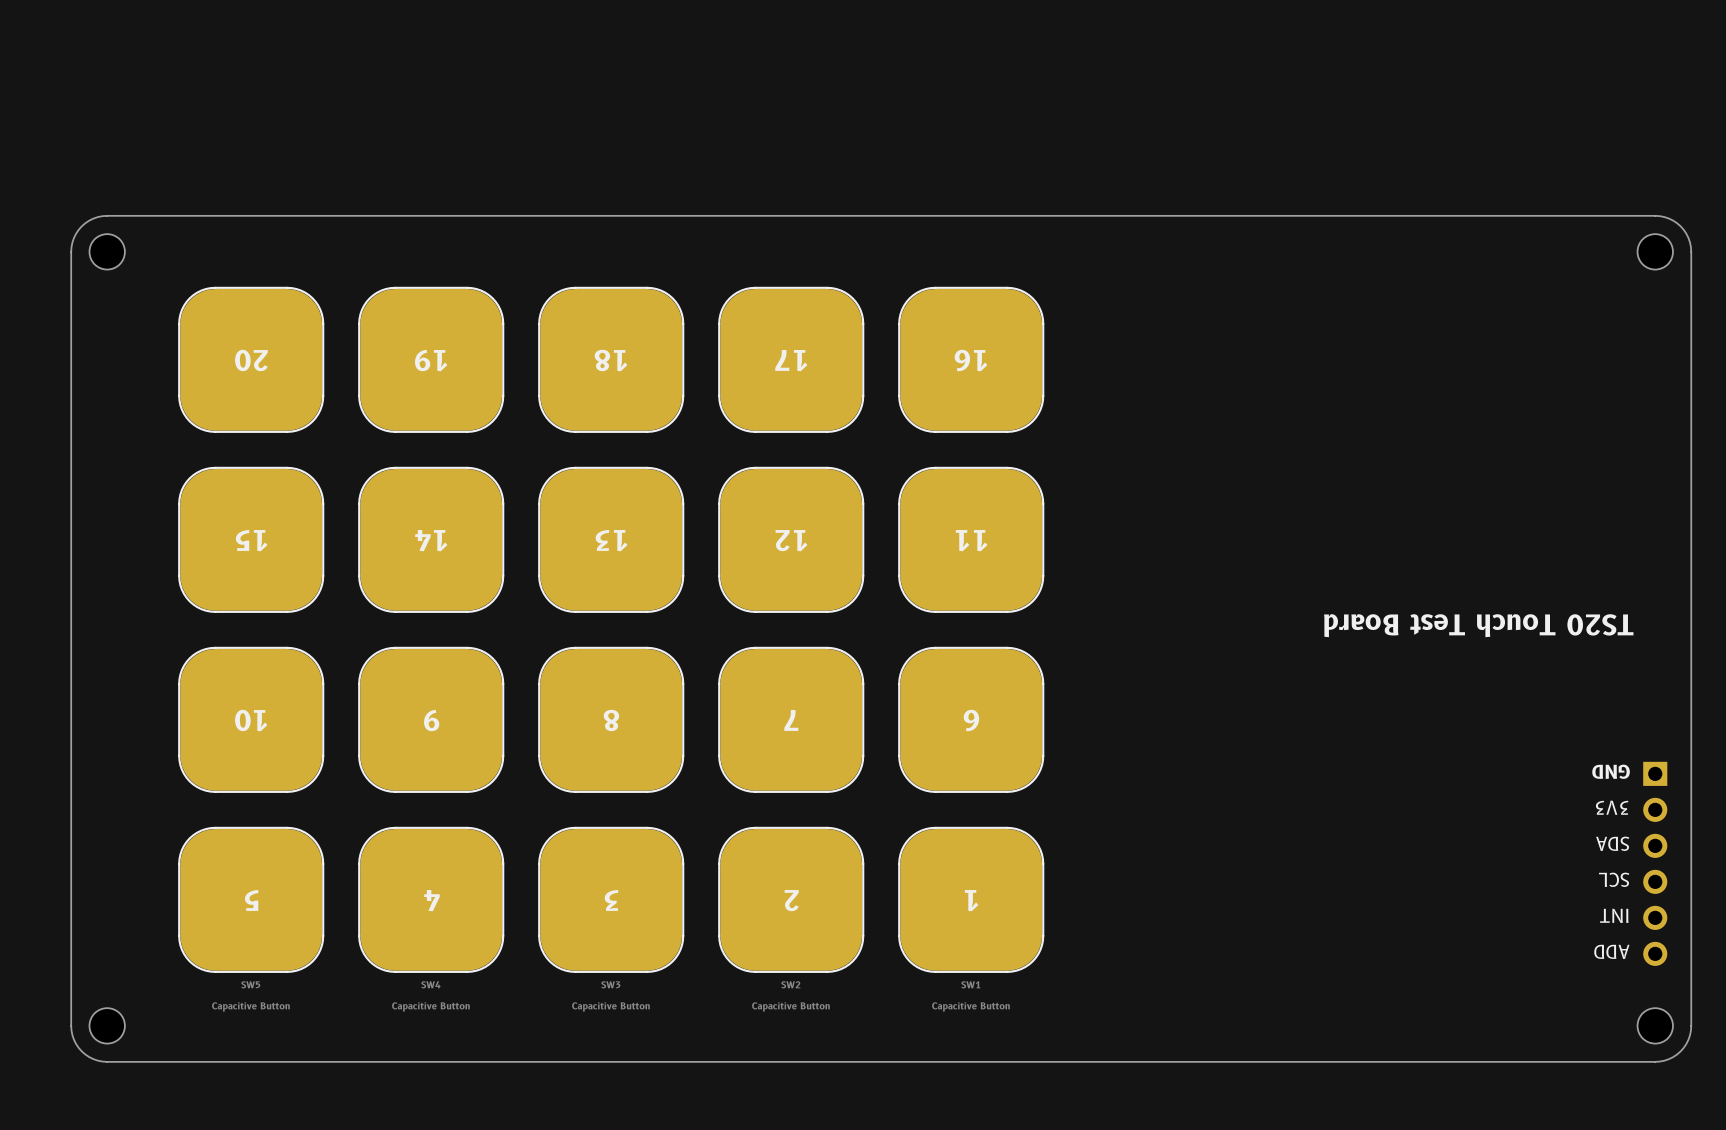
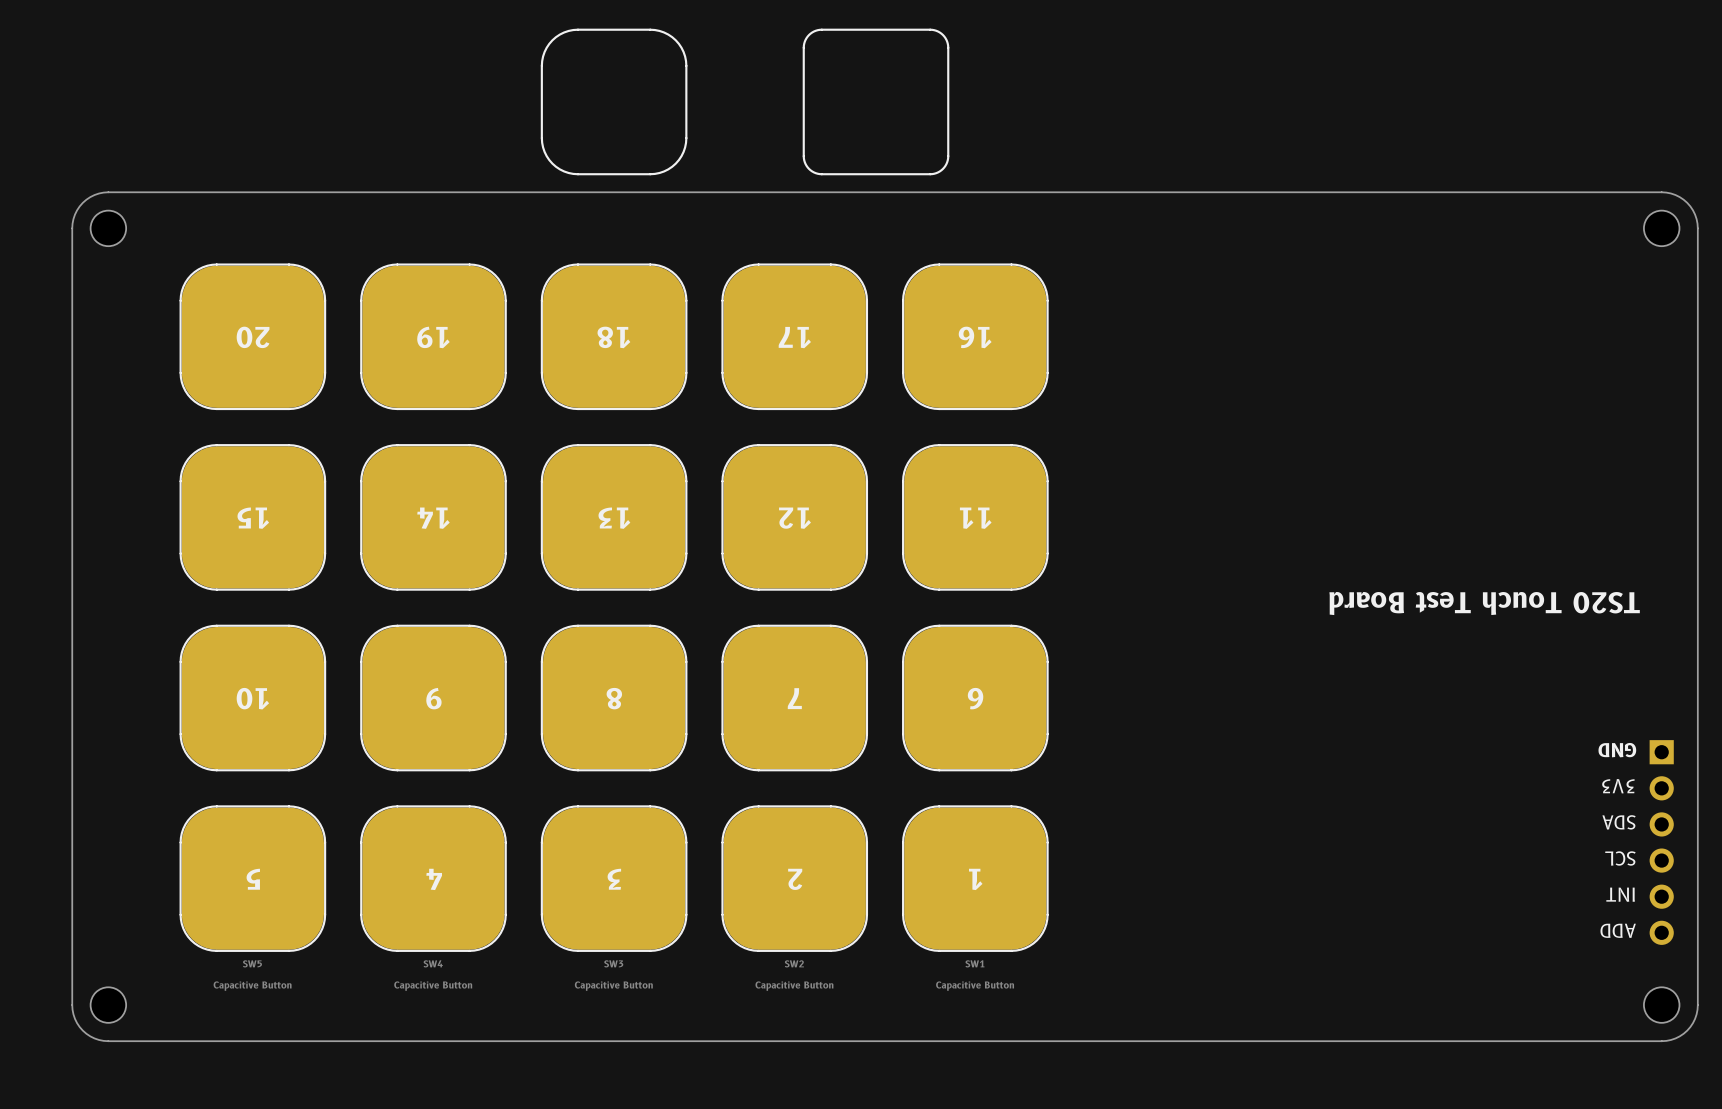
line: none -> (650, 29) (573, 30) (559, 34) (546, 47) (541, 65) (542, 142) (549, 160) (559, 169) (577, 174) (654, 173) (672, 166) (681, 156) (686, 138) (685, 56) (678, 43) (672, 37) (664, 32) (650, 29)
line: none -> (930, 29) (821, 29) (813, 31) (807, 36) (803, 47) (803, 156) (805, 163) (810, 170) (821, 174) (930, 174) (938, 172) (944, 167) (948, 156) (948, 45) (941, 33) (930, 29)

